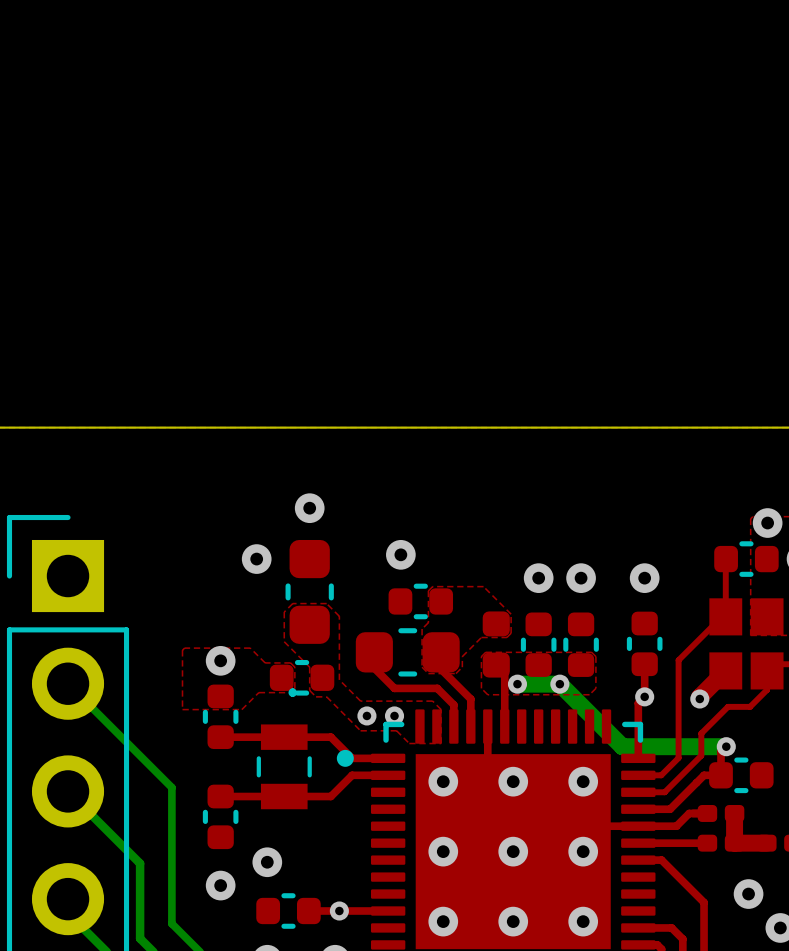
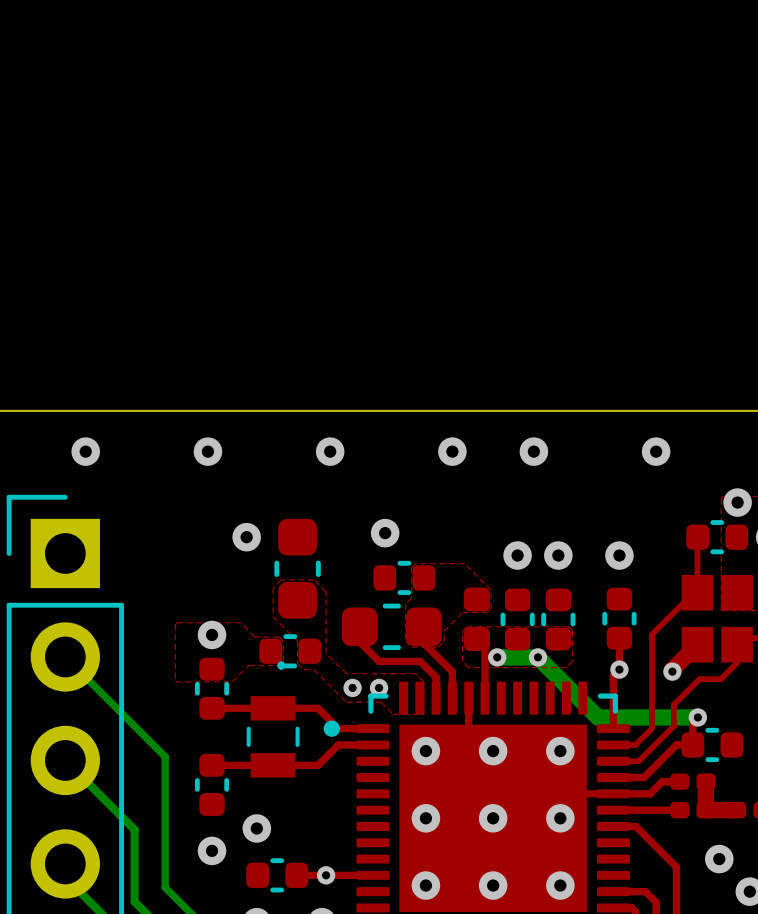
via: none -> (85, 451)
via: none -> (207, 451)
via: none -> (330, 451)
via: none -> (452, 451)
via: none -> (533, 451)
via: none -> (656, 451)
via: (309, 508) -> none

